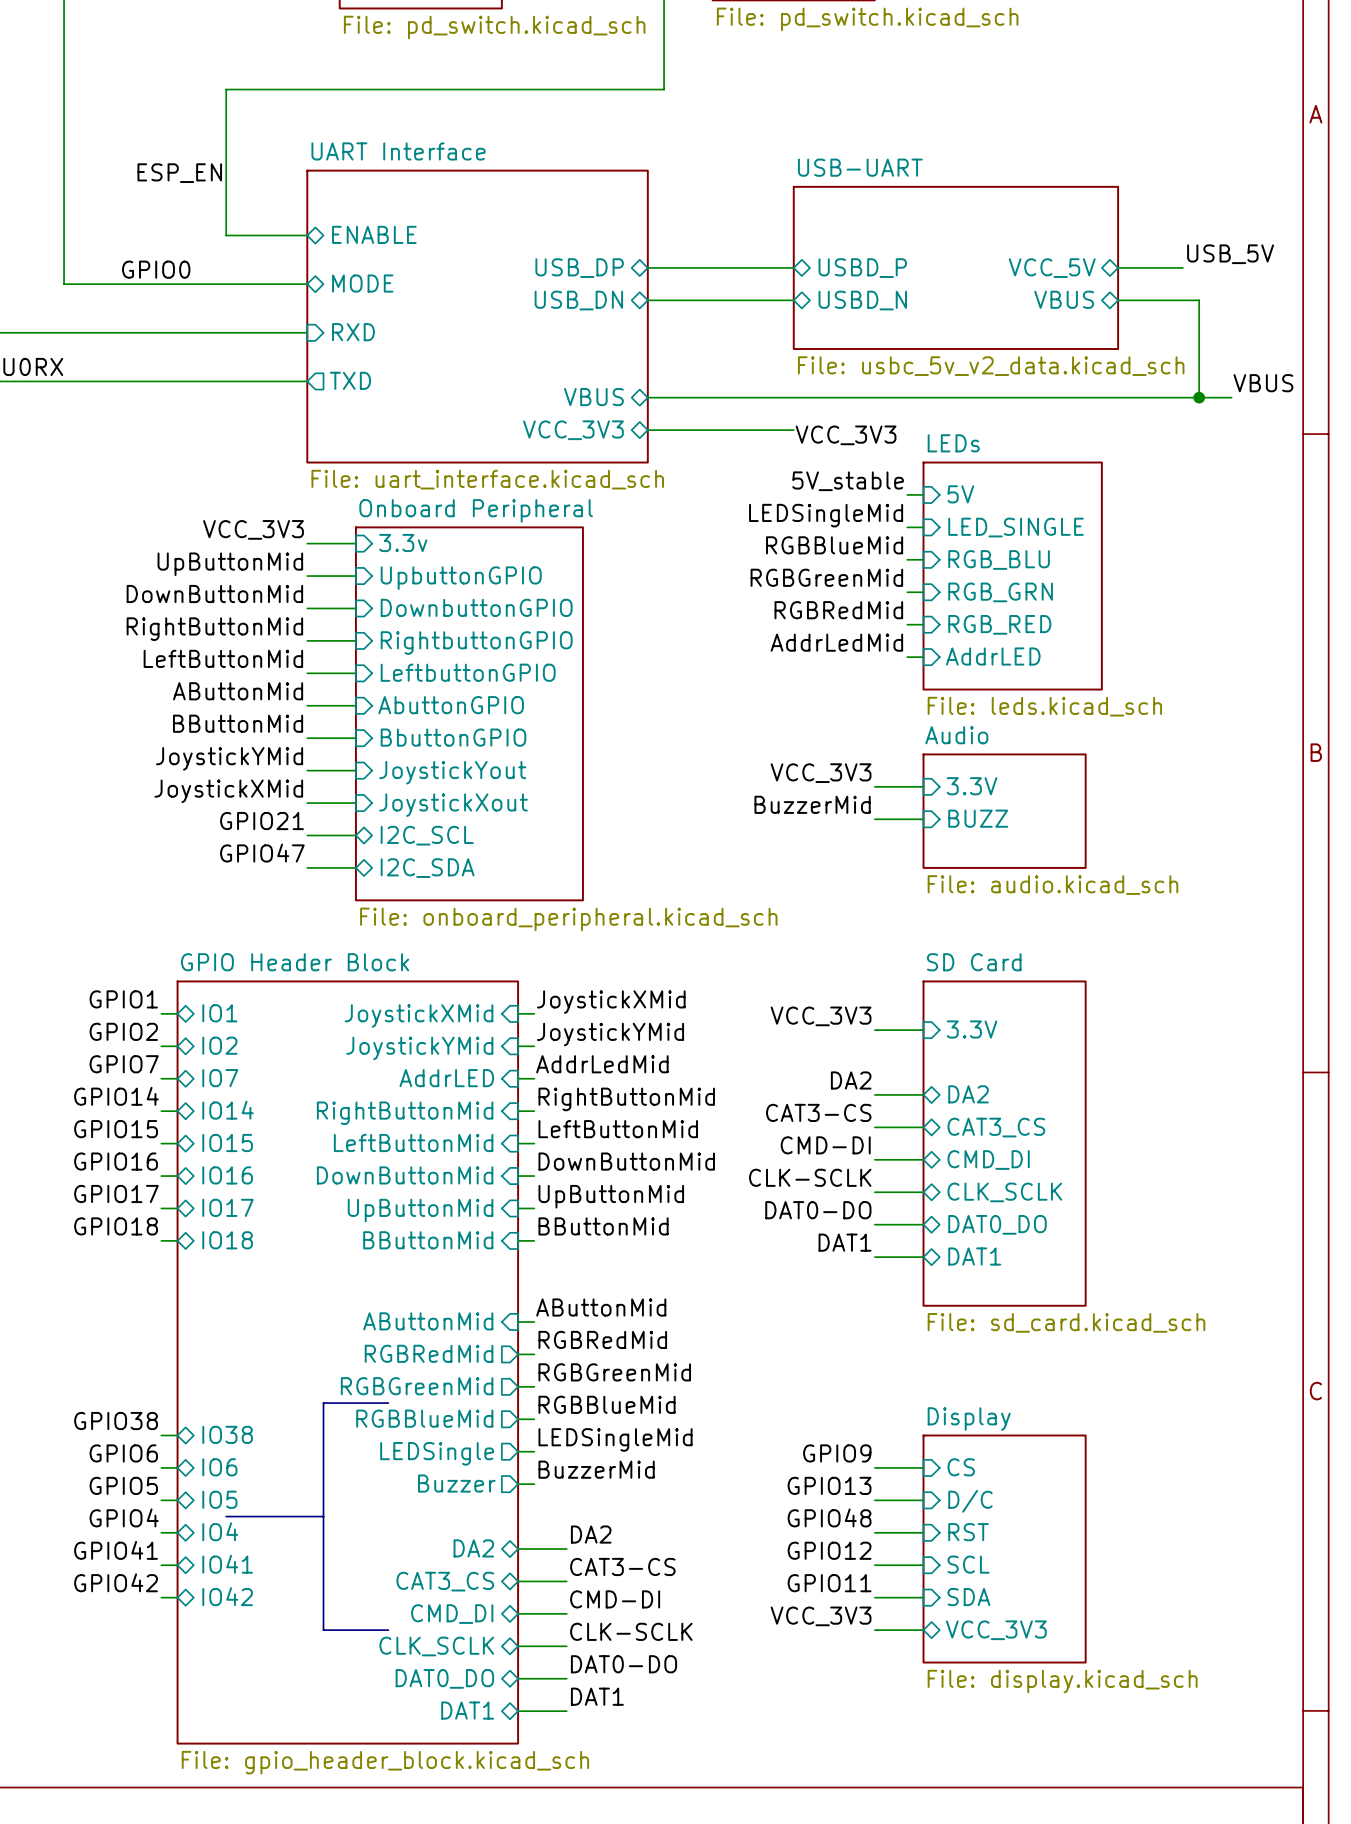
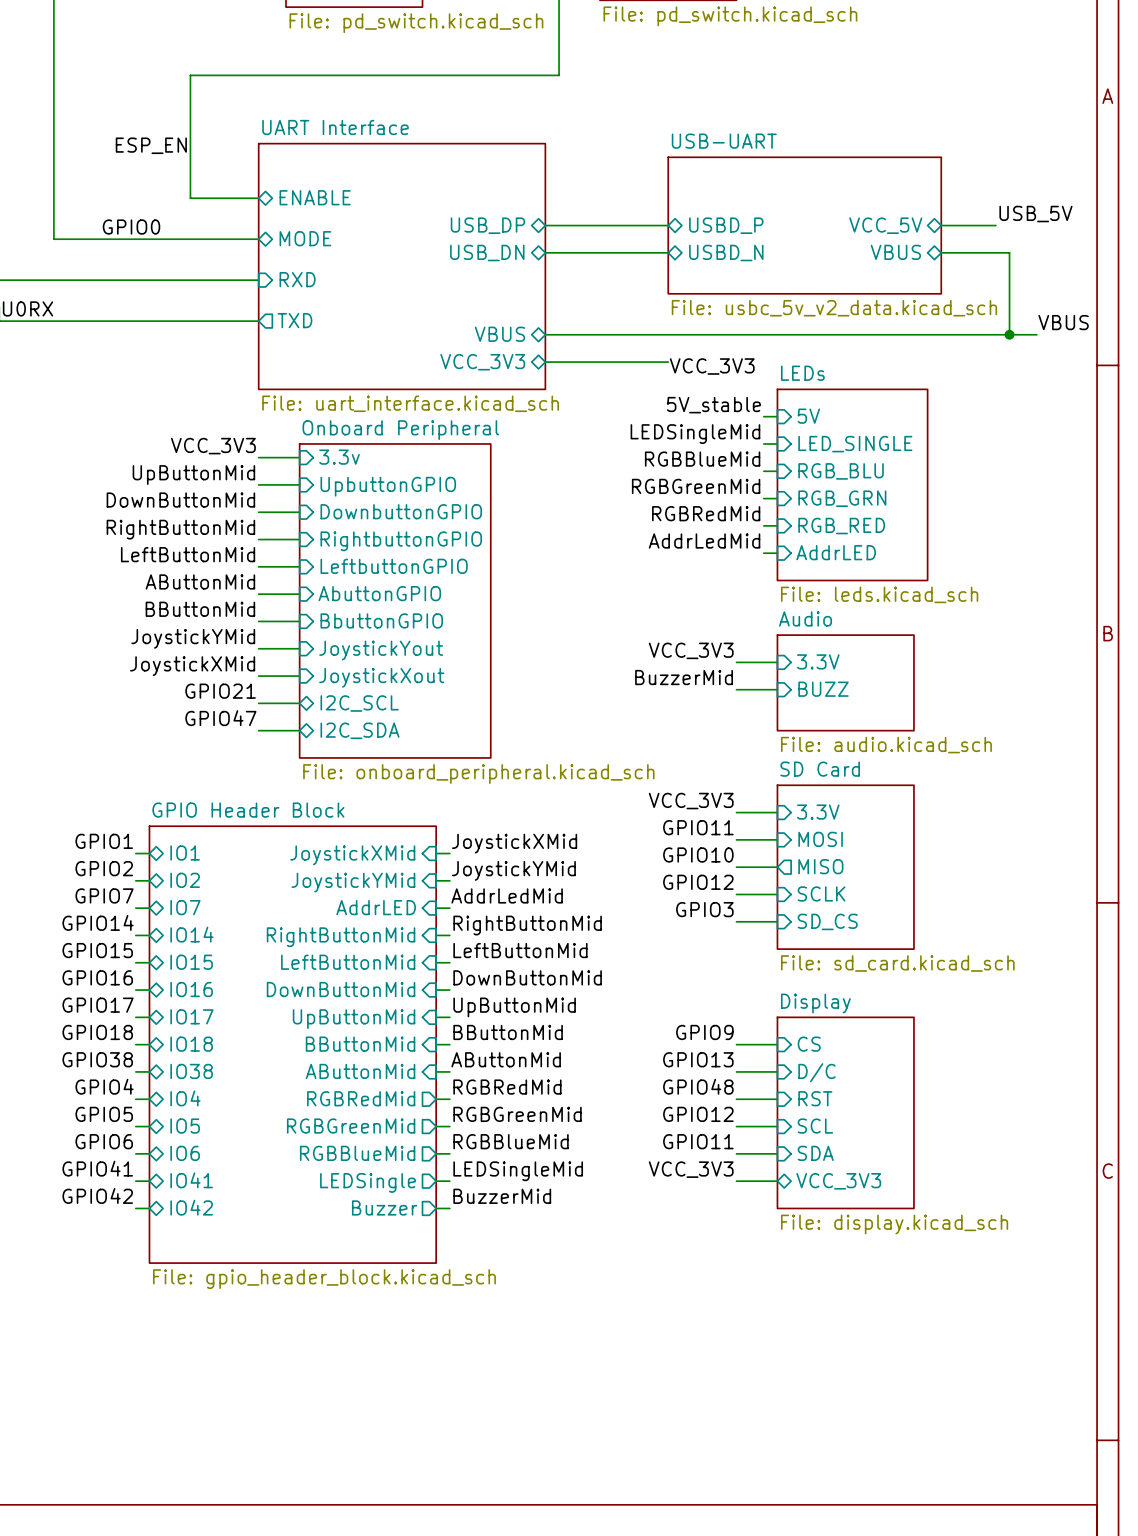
label: none -> VCC_3V3 (691, 801)
sheet pin: none -> 3.3V (818, 812)
label: none -> GPIO11 (698, 827)
sheet pin: none -> MOSI (820, 839)
label: VCC_3V3 (821, 1016) -> GPIO10 (698, 855)
sheet pin shape: input (972, 1029) -> output (820, 866)
sheet pin: 3.3V (972, 1029) -> MISO (820, 866)
sheet SD Card: none -> File: sd_card.kicad_sch (845, 867)
label: none -> GPIO12 (698, 882)
sheet pin: none -> SCLK (821, 893)
label: DA2 (851, 1080) -> GPIO3 (704, 909)
sheet pin shape: bidirectional (968, 1094) -> input (827, 921)
sheet pin: DA2 (968, 1094) -> SD_CS (827, 921)
label: CAT3-CS (818, 1112) -> none
wire: (874, 1127) (923, 1127) -> none
sheet pin: CAT3_CS (996, 1127) -> none
sheet SD Card: File: sd_card.kicad_sch (1004, 1143) -> none
label: CMD-DI (825, 1145) -> none
wire: (874, 1159) (923, 1159) -> (736, 812) (777, 812)
sheet pin: CMD_DI (988, 1159) -> none
label: CLK-SCLK (810, 1177) -> none
wire: (874, 1192) (923, 1192) -> (736, 839) (777, 839)
sheet pin: CLK_SCLK (1004, 1192) -> none
label: DAT0-DO (818, 1210) -> none
wire: (874, 1224) (923, 1224) -> (736, 1044) (777, 1044)
sheet pin: DAT0_DO (997, 1224) -> none
sheet GPIO Header Block: none -> File: gpio_header_block.kicad_sch (292, 1044)
label: DAT1 (845, 1242) -> none
sheet pin: DAT1 (974, 1256) -> none
wire: (874, 1257) (923, 1257) -> (736, 894) (777, 894)
label: none -> GPIO38 (97, 1059)
sheet pin: none -> IO38 (191, 1071)
label position: AButtonMid (601, 1307) -> AButtonMid (506, 1059)
sheet pin position: AButtonMid (428, 1321) -> AButtonMid (360, 1071)
wire: (518, 1321) (534, 1321) -> (436, 1099) (449, 1099)
label position: RGBRedMid (602, 1339) -> RGBRedMid (507, 1087)
sheet pin position: RGBRedMid (429, 1353) -> RGBRedMid (361, 1098)
wire: (518, 1354) (534, 1354) -> (436, 1153) (449, 1153)
sheet GPIO Header Block: File: gpio_header_block.kicad_sch (347, 1362) -> none
label position: RGBGreenMid (614, 1372) -> RGBGreenMid (517, 1114)
sheet pin position: RGBGreenMid (417, 1386) -> RGBGreenMid (351, 1126)
wire: (518, 1386) (534, 1386) -> (436, 1181) (449, 1181)
line: (388, 1403) (323, 1403) (323, 1630) (388, 1630) -> none
label position: RGBBlueMid (607, 1404) -> RGBBlueMid (511, 1141)
sheet pin position: RGBBlueMid (424, 1418) -> RGBBlueMid (357, 1153)
wire: (518, 1419) (534, 1419) -> (436, 1126) (449, 1126)
label: GPIO38 (116, 1421) -> GPIO42 (97, 1195)
sheet pin: IO38 (227, 1434) -> IO42 (191, 1207)
label position: LEDSingleMid (615, 1439) -> LEDSingleMid (518, 1171)
wire: (518, 1451) (534, 1451) -> (436, 1208) (449, 1208)
label position: GPIO6 (123, 1453) -> GPIO6 (104, 1141)
sheet pin position: LEDSingle (437, 1453) -> LEDSingle (368, 1182)
label position: GPIO9 (837, 1453) -> GPIO9 (704, 1032)
wire: (161, 1467) (177, 1467) -> (135, 1071) (149, 1071)
sheet pin position: IO6 (219, 1467) -> IO6 (185, 1153)
wire: (874, 1467) (923, 1467) -> (736, 1071) (777, 1071)
sheet pin position: CS (961, 1467) -> CS (809, 1044)
label position: BuzzerMid (596, 1469) -> BuzzerMid (502, 1196)
sheet pin position: Buzzer (456, 1483) -> Buzzer (384, 1207)
wire: (518, 1484) (534, 1484) -> (436, 1071) (449, 1071)
label position: GPIO5 (123, 1485) -> GPIO5 (104, 1114)
label position: GPIO13 (829, 1485) -> GPIO13 (698, 1059)
sheet pin position: IO5 (219, 1499) -> IO5 (185, 1126)
wire: (161, 1500) (177, 1500) -> (135, 1099) (149, 1099)
wire: (874, 1500) (923, 1500) -> (736, 1099) (777, 1099)
sheet pin position: D/C (970, 1501) -> D/C (816, 1072)
line: (226, 1516) (323, 1516) -> none
label position: GPIO4 (124, 1517) -> GPIO4 (104, 1086)
label position: GPIO48 (829, 1517) -> GPIO48 (698, 1086)
sheet pin position: IO4 (220, 1531) -> IO4 (185, 1098)
wire: (161, 1532) (177, 1532) -> (135, 1126) (149, 1126)
wire: (874, 1532) (923, 1532) -> (736, 1126) (777, 1126)
sheet pin position: RST (968, 1532) -> RST (815, 1098)
label: DA2 (591, 1534) -> none
sheet pin: DA2 (473, 1548) -> none
wire: (518, 1549) (566, 1549) -> none
sheet Display position: (1004, 1549) -> (845, 1112)
label position: GPIO41 (116, 1550) -> GPIO41 (97, 1168)
label position: GPIO12 (829, 1550) -> GPIO12 (698, 1114)
sheet pin position: IO41 (227, 1564) -> IO41 (191, 1180)
sheet pin position: SCL (968, 1564) -> SCL (815, 1126)
wire: (161, 1565) (177, 1565) -> (135, 1153) (149, 1153)
wire: (874, 1565) (923, 1565) -> (736, 1153) (777, 1153)
label: CAT3-CS (622, 1566) -> none
sheet pin: CAT3_CS (445, 1581) -> none
wire: (518, 1581) (566, 1581) -> none
label: GPIO42 (116, 1582) -> none
label position: GPIO11 (829, 1583) -> GPIO11 (698, 1141)
sheet pin: IO42 (227, 1596) -> none
wire: (161, 1597) (177, 1597) -> (135, 1181) (149, 1181)
wire: (874, 1597) (923, 1597) -> (736, 1181) (777, 1181)
sheet pin position: SDA (968, 1597) -> SDA (815, 1153)
label: CMD-DI (615, 1599) -> none
wire: (518, 1613) (566, 1613) -> none
sheet pin: CMD_DI (452, 1614) -> none
label position: VCC_3V3 (821, 1616) -> VCC_3V3 (691, 1169)
wire: (874, 1630) (923, 1630) -> none
sheet pin position: VCC_3V3 (996, 1630) -> VCC_3V3 (838, 1181)
label: CLK-SCLK (631, 1631) -> none
sheet pin: CLK_SCLK (436, 1646) -> none
wire: (518, 1646) (566, 1646) -> none
label: DAT0-DO (624, 1664) -> none
sheet pin: DAT0_DO (444, 1678) -> none
wire: (518, 1678) (566, 1678) -> none
label: DAT1 (597, 1696) -> none
sheet pin: DAT1 (467, 1710) -> none
wire: (518, 1711) (566, 1711) -> none

